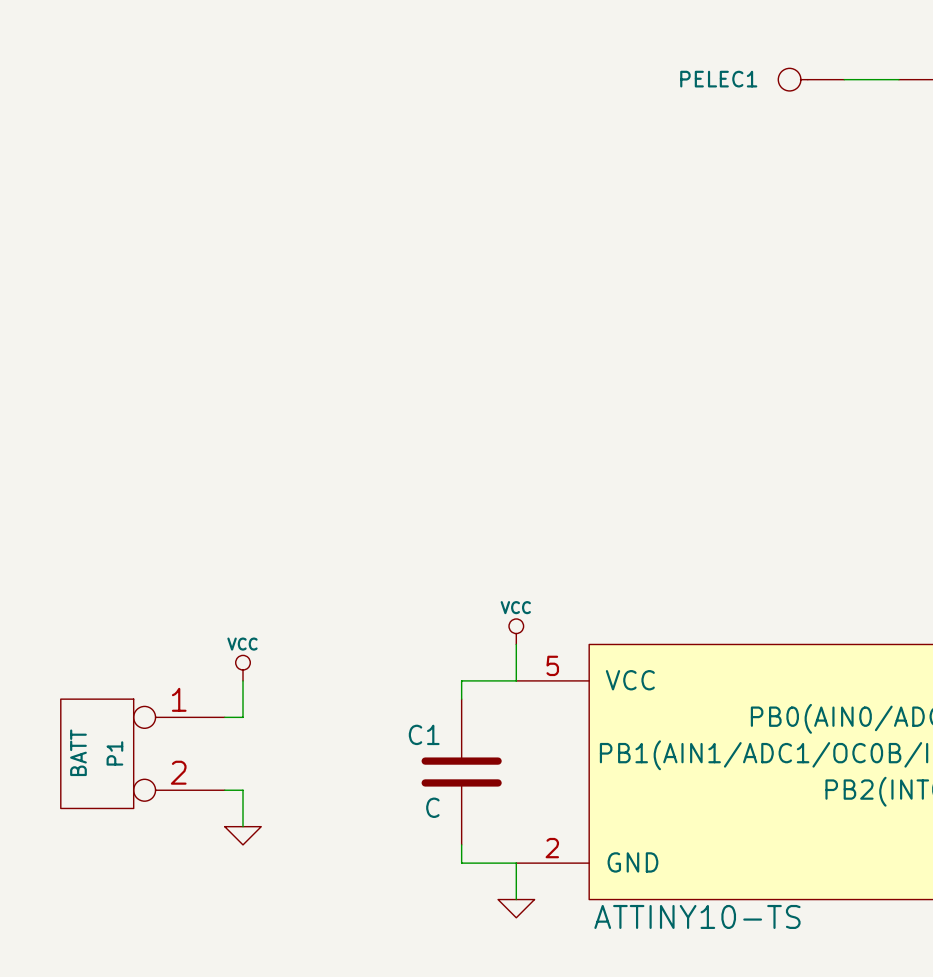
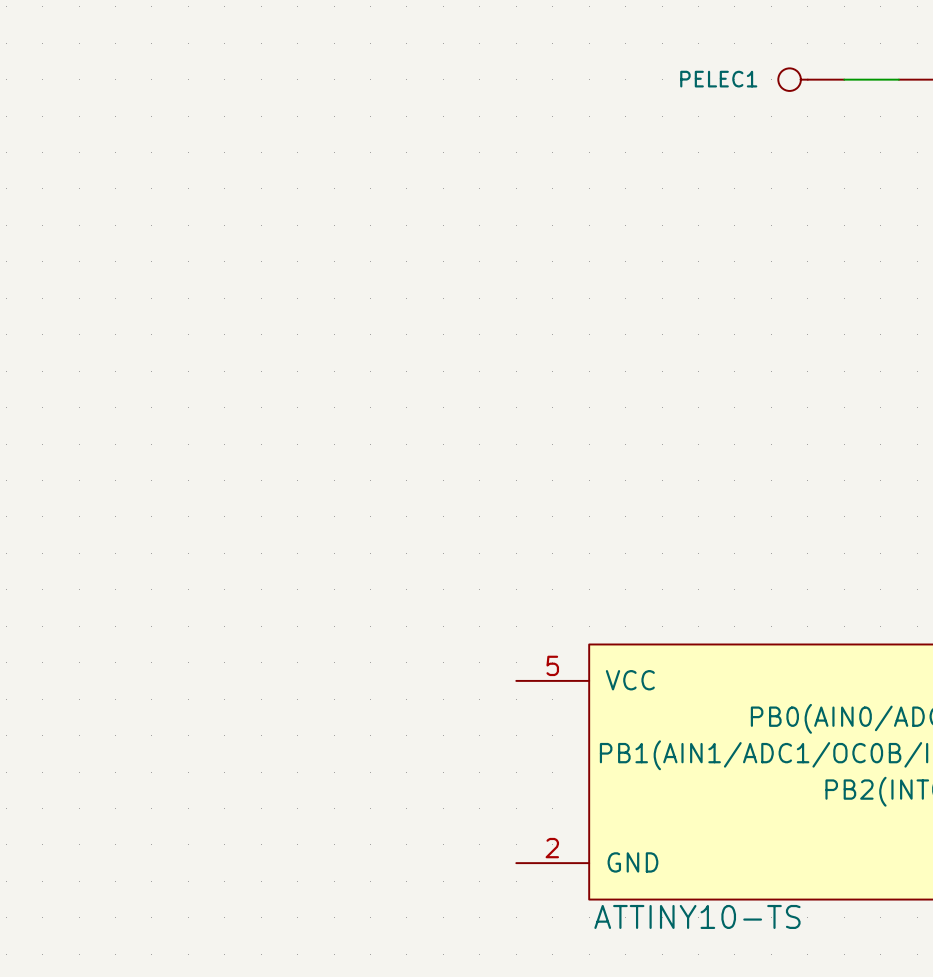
power symbol: VCC (516, 631) -> none
wire: (516, 644) (516, 680) (461, 680) (461, 699) -> none
power symbol: VCC (243, 668) -> none
wire: (243, 680) (243, 717) (224, 717) -> none
P1: BATT (142, 753) -> none
C1: C (461, 772) -> none
wire: (224, 790) (243, 790) (243, 826) -> none
power symbol: (243, 835) -> none
wire: (461, 844) (461, 863) (516, 863) (516, 899) -> none
power symbol: (516, 908) -> none

